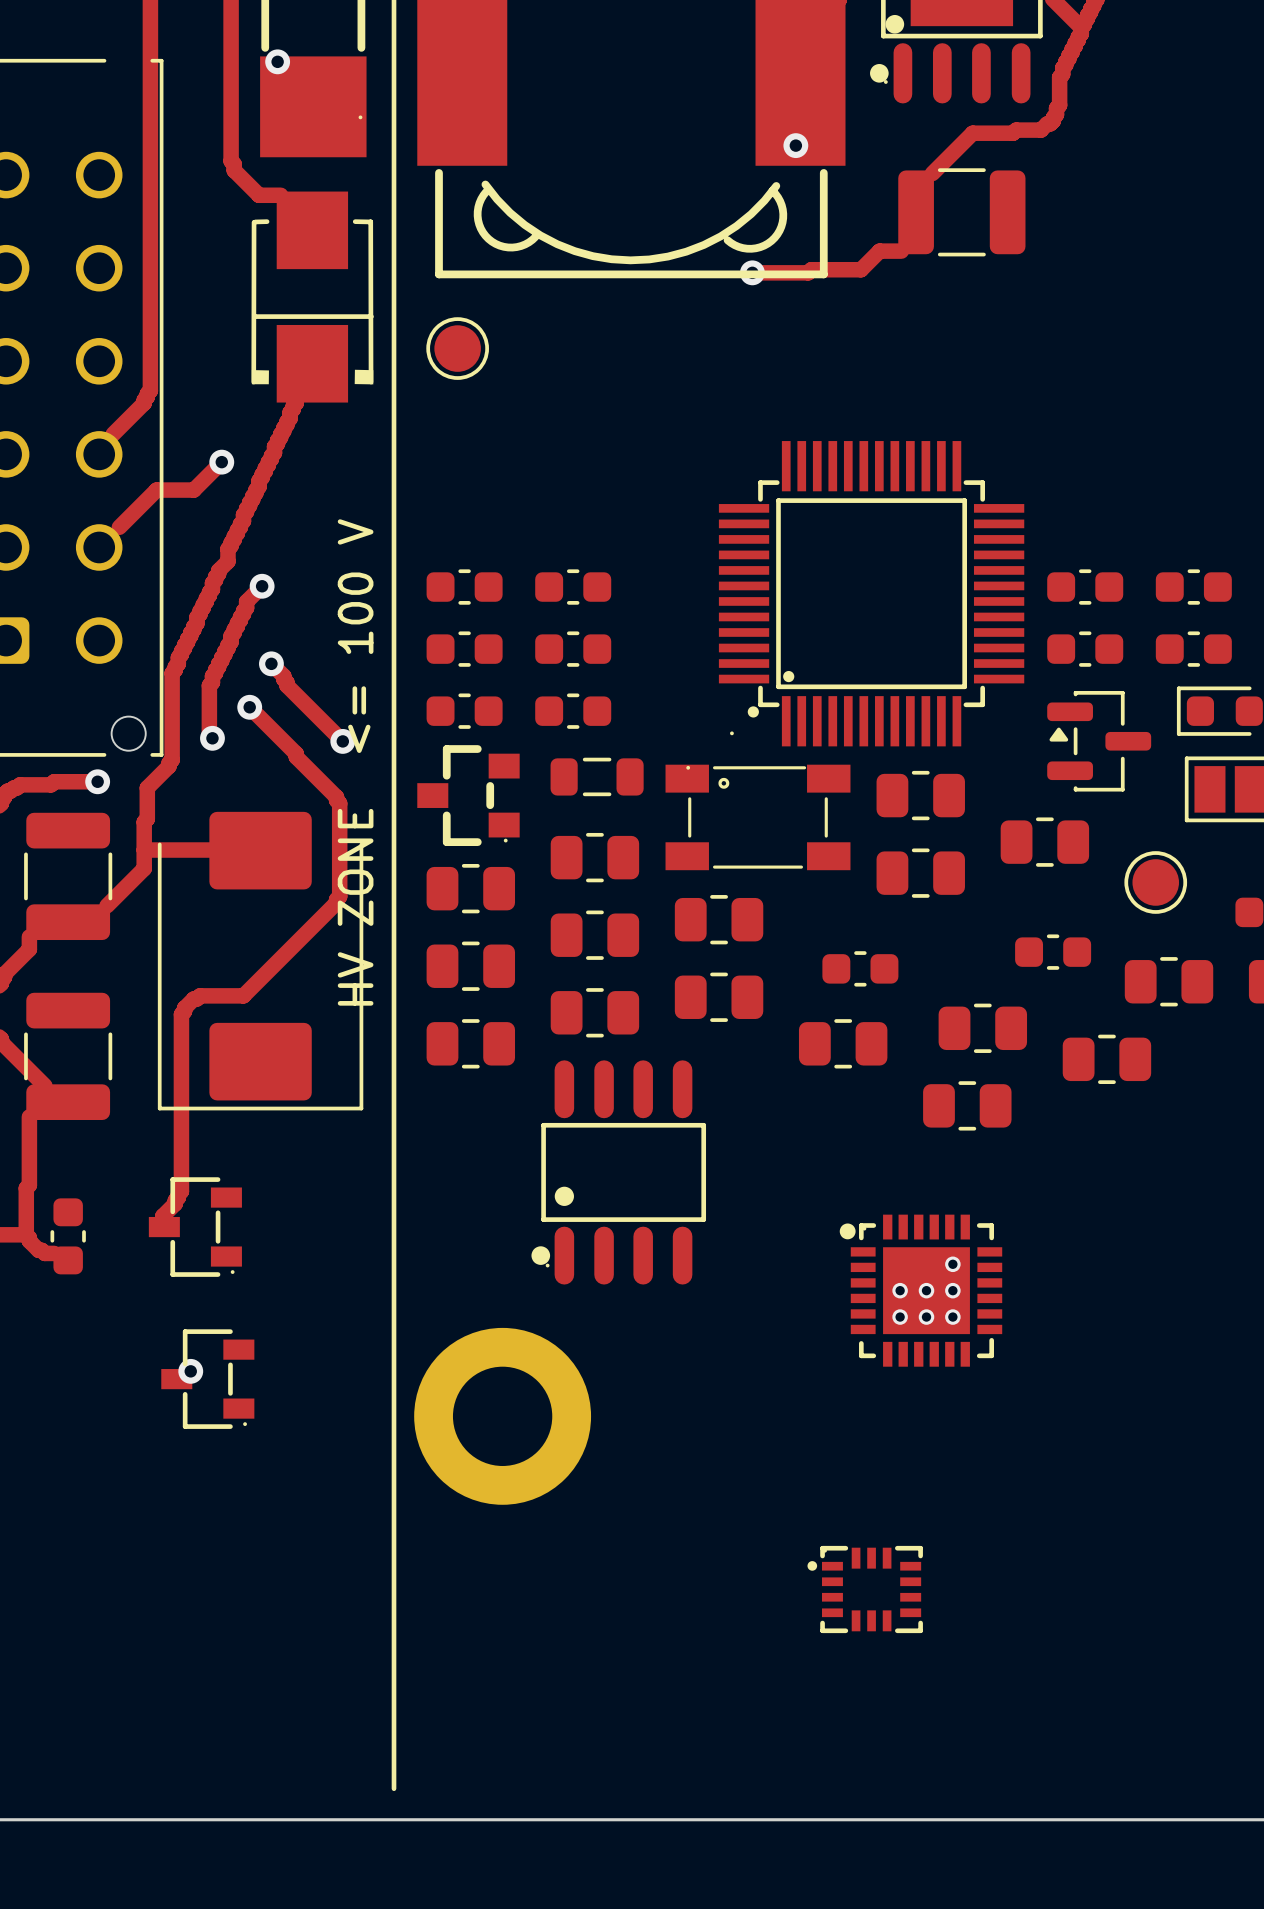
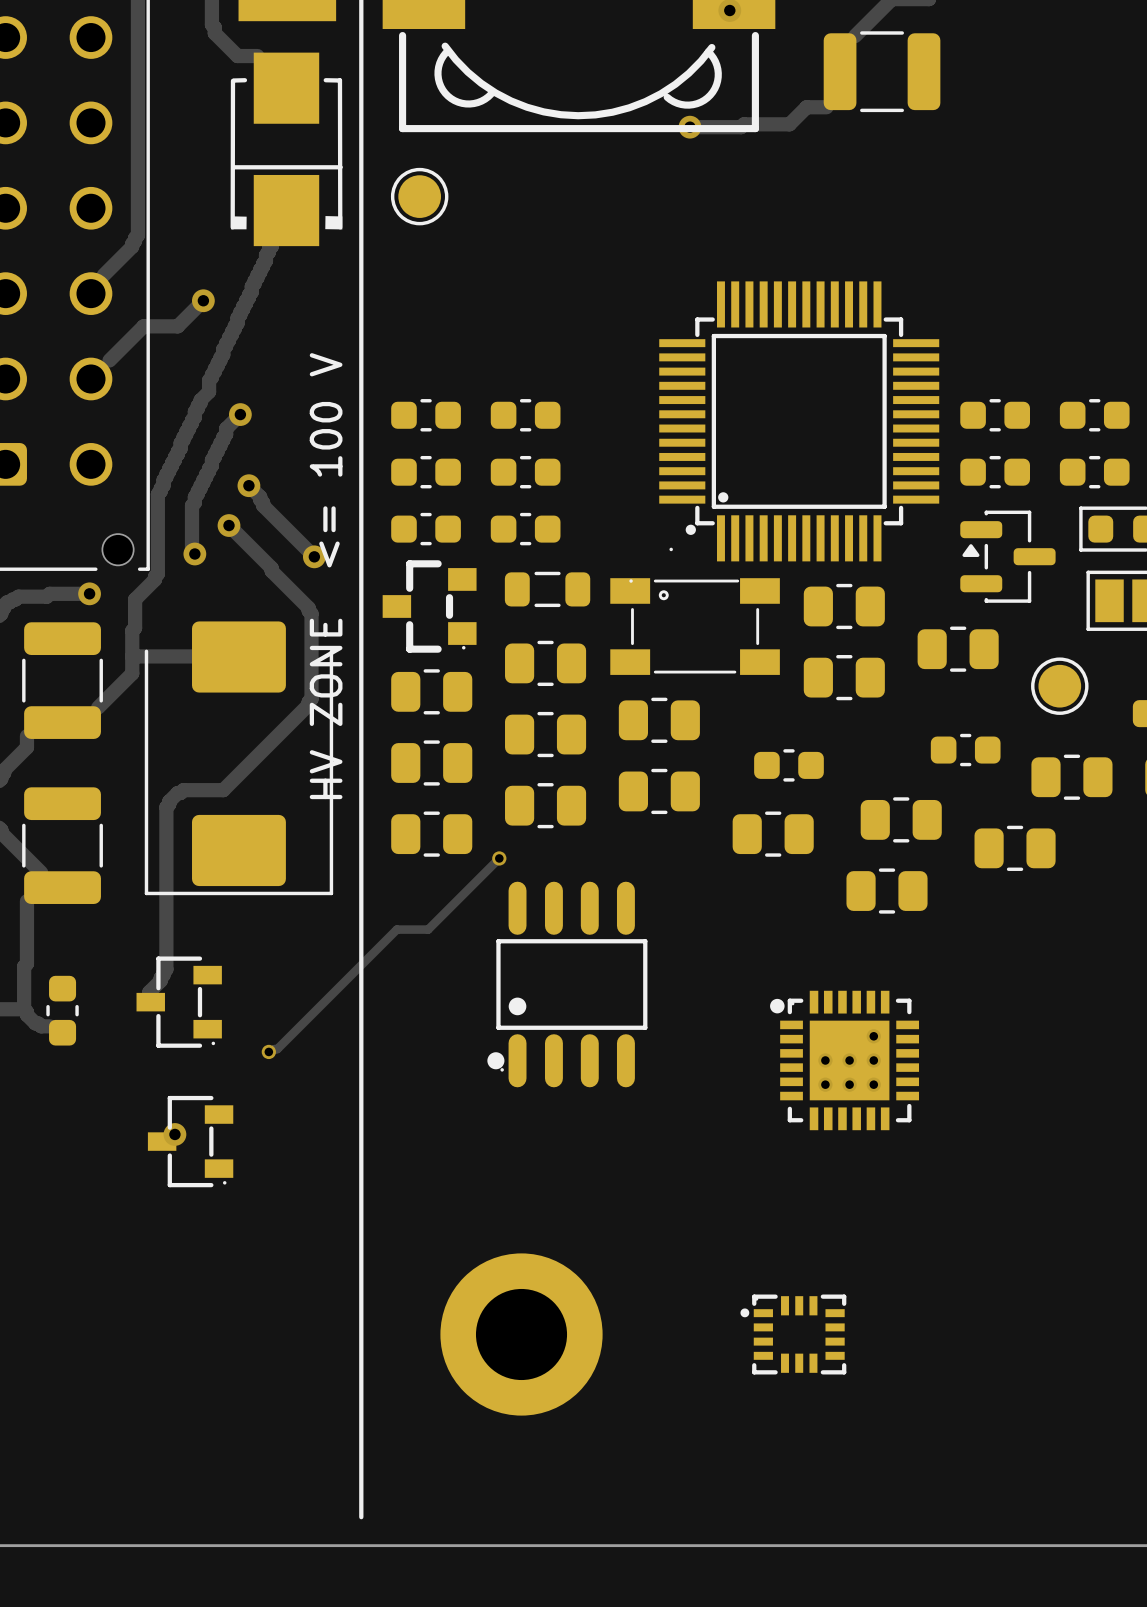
track: none -> (499, 858) (428, 929) (396, 929) (277, 1049) (268, 1051)
via: none -> (499, 858)
part position: (618, 1172) -> (567, 984)
via: none -> (268, 1051)
part position: (502, 1416) -> (521, 1334)

